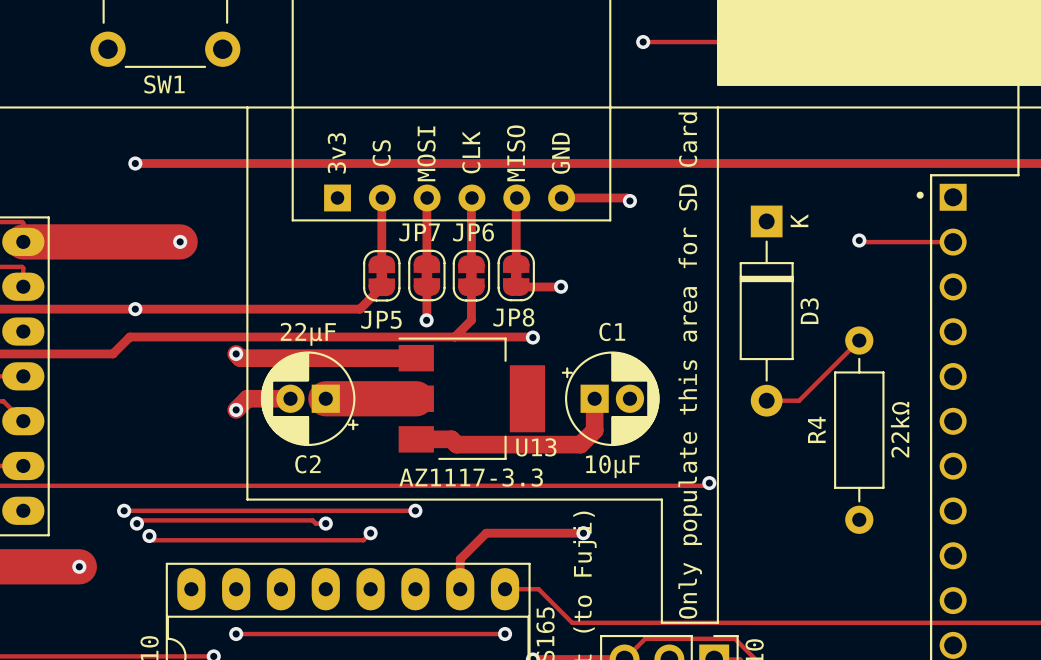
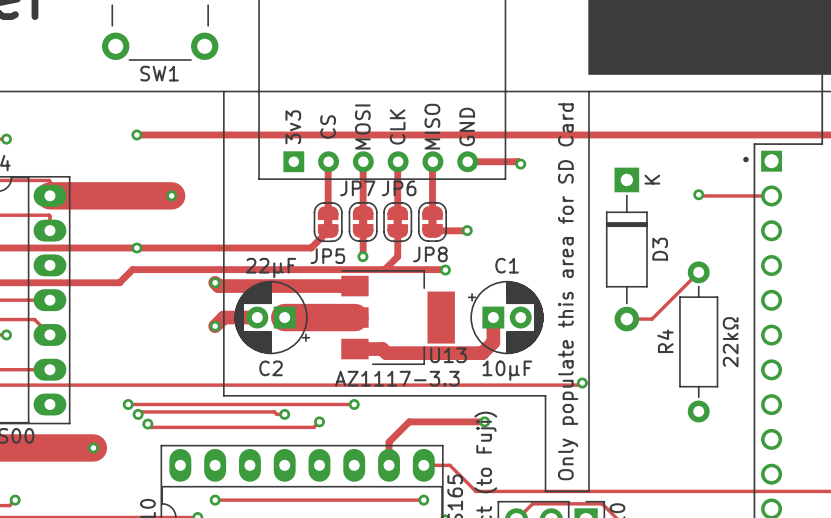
track: (643, 42) (766, 42) -> none
via: (643, 42) -> none

